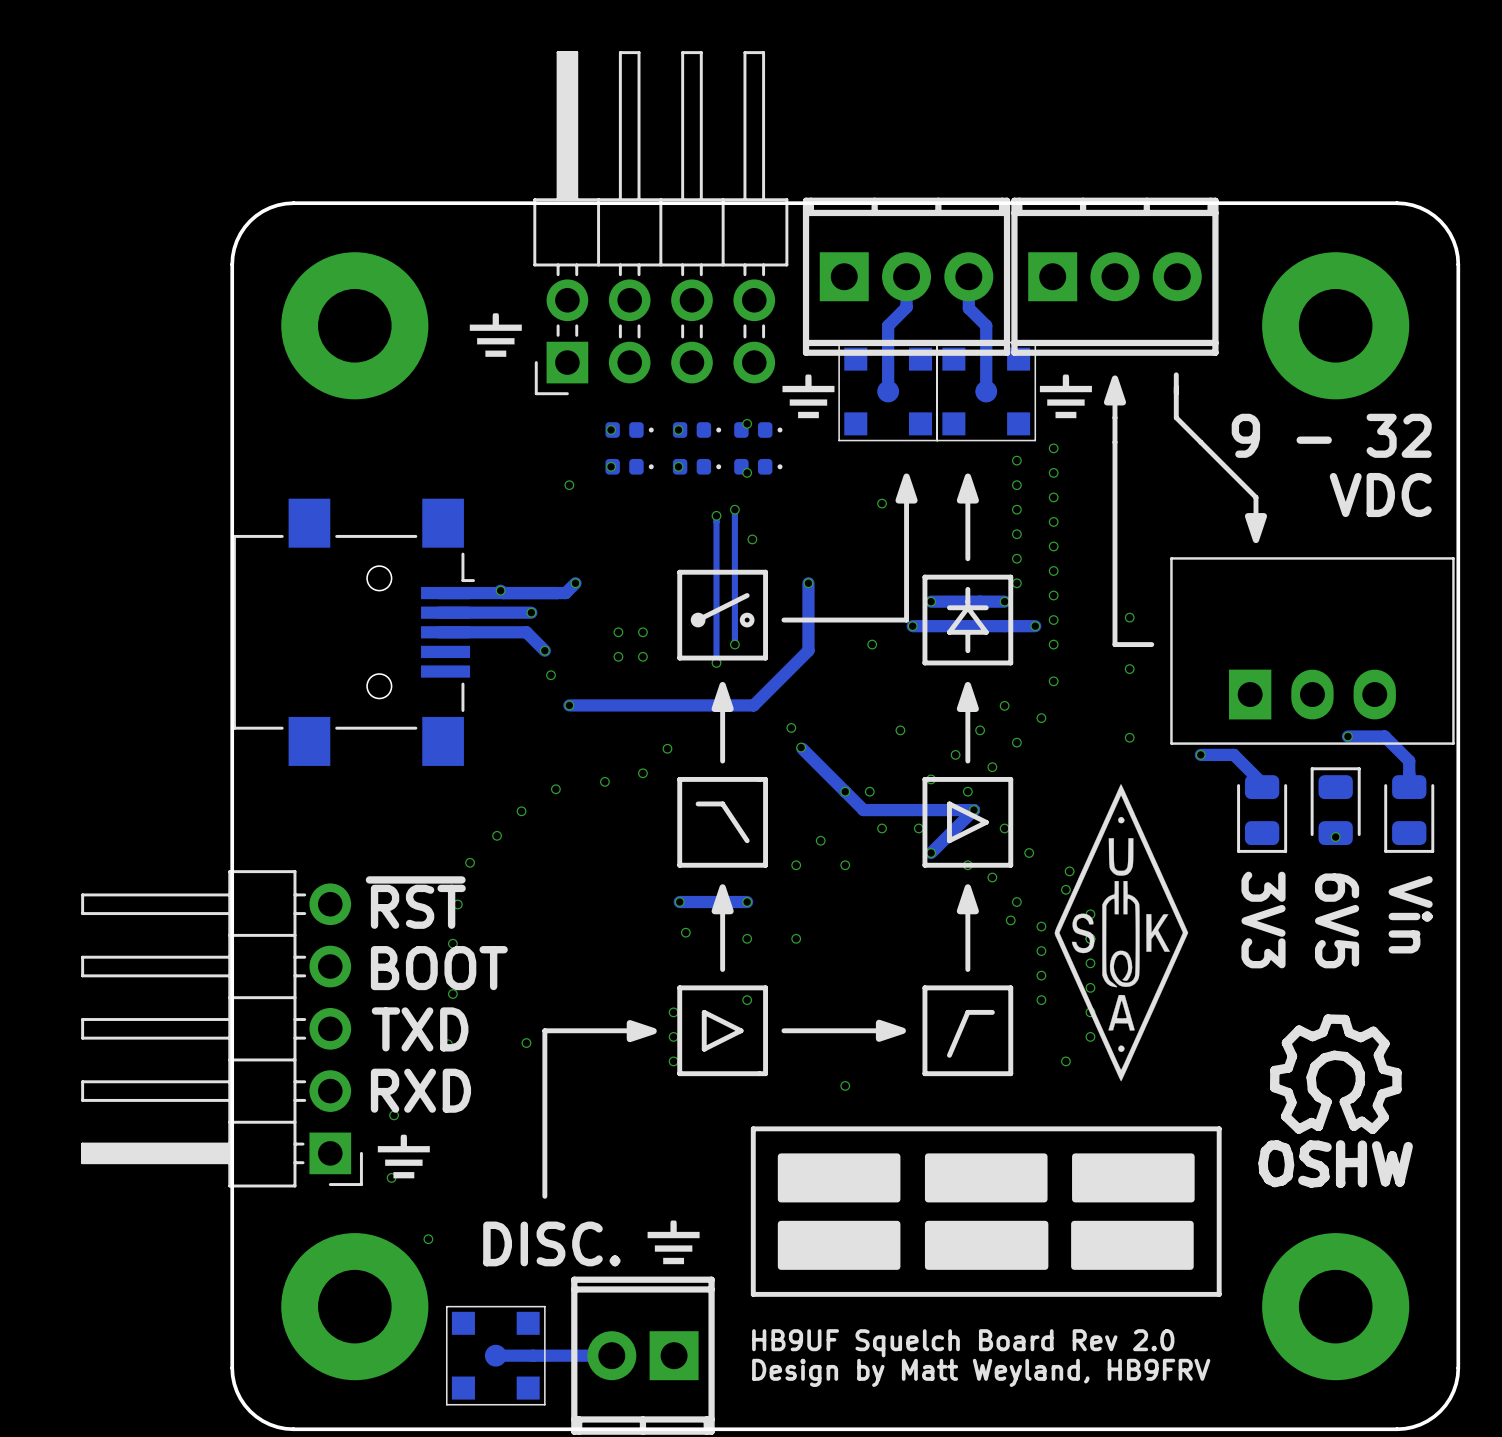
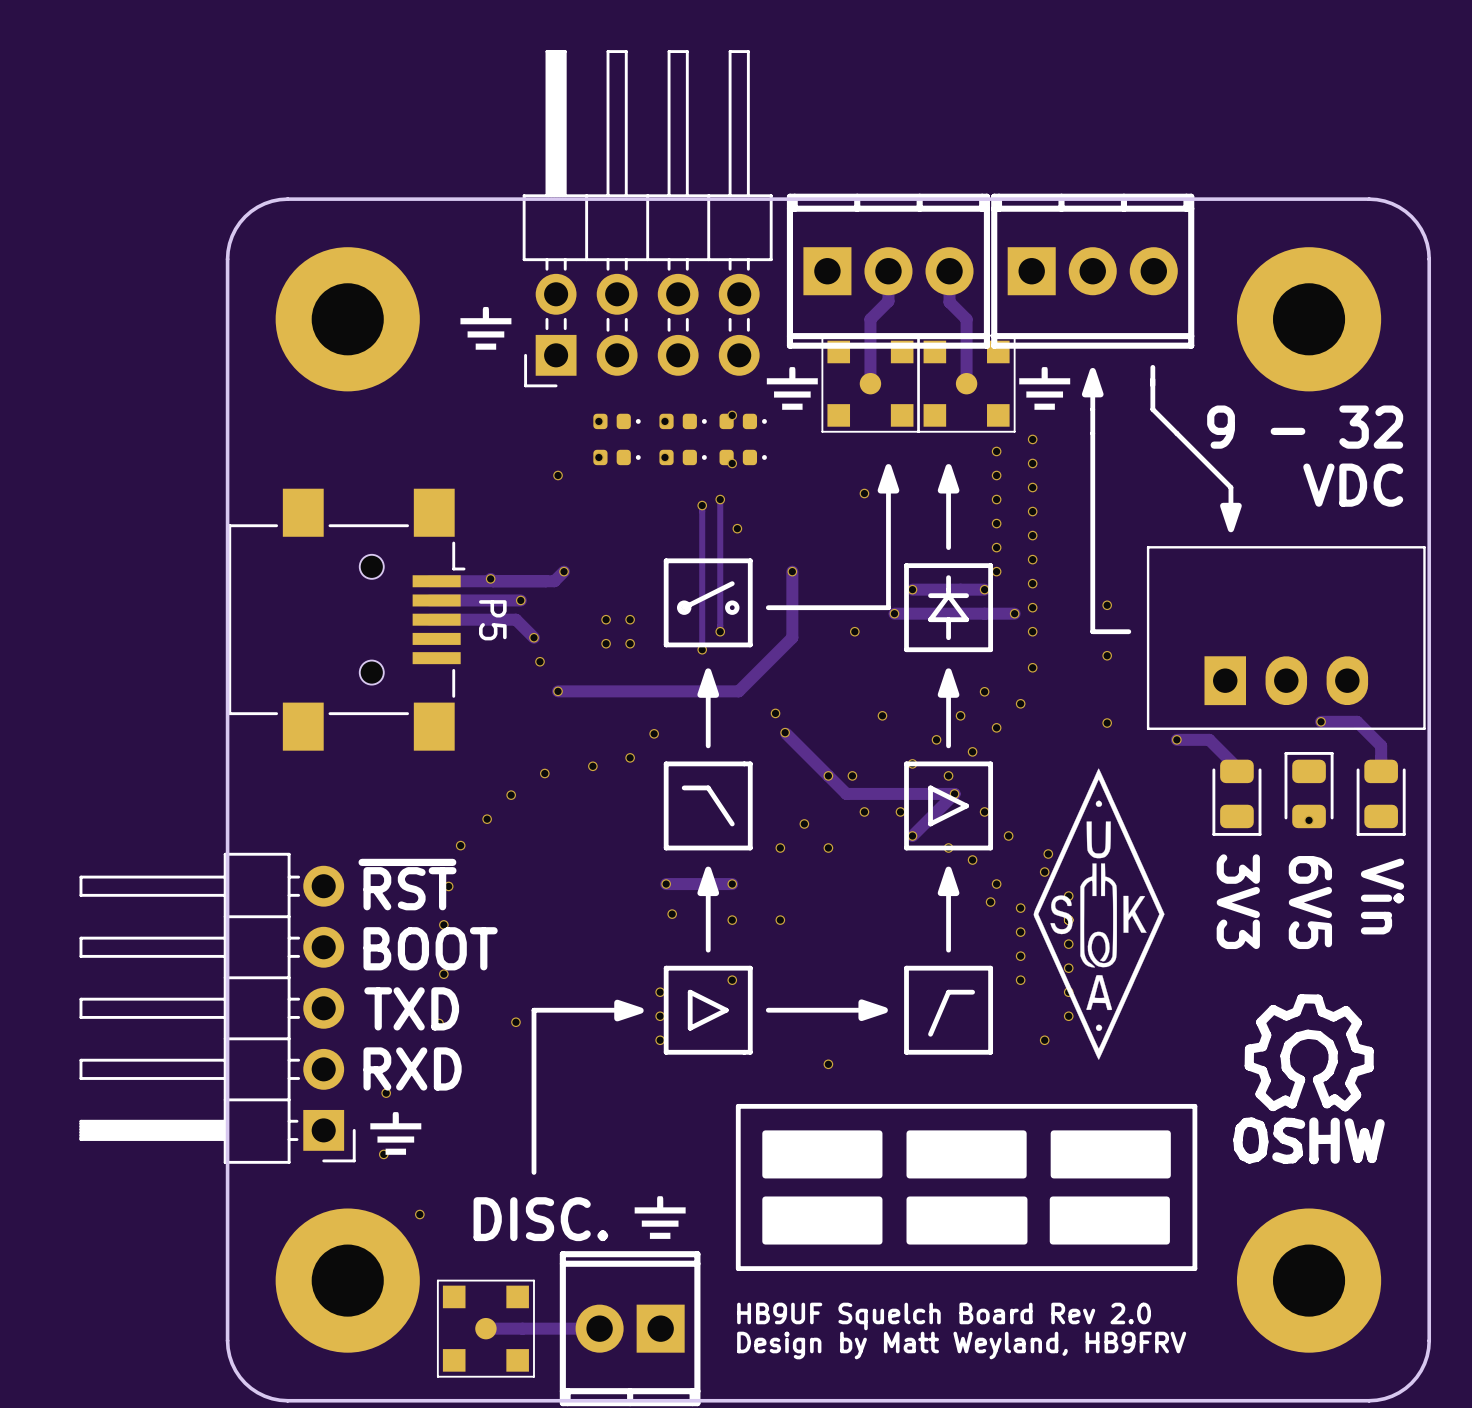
P5 name: none -> P5 (492, 620)

